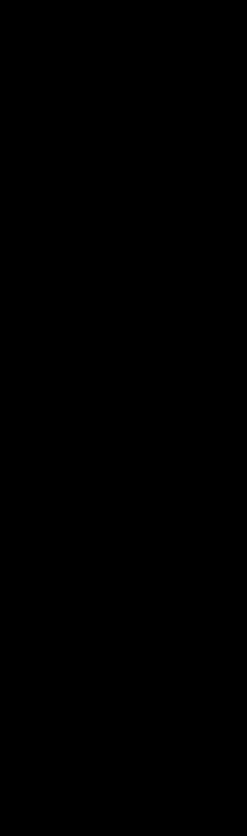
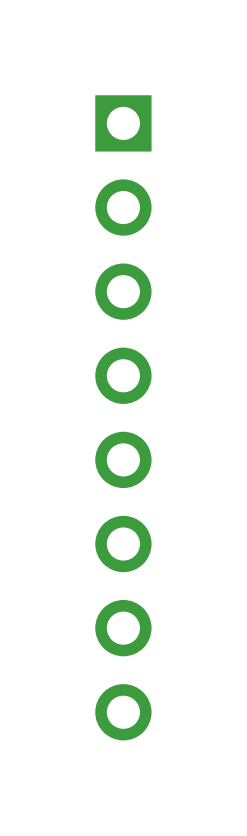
part: none -> (123, 417)

